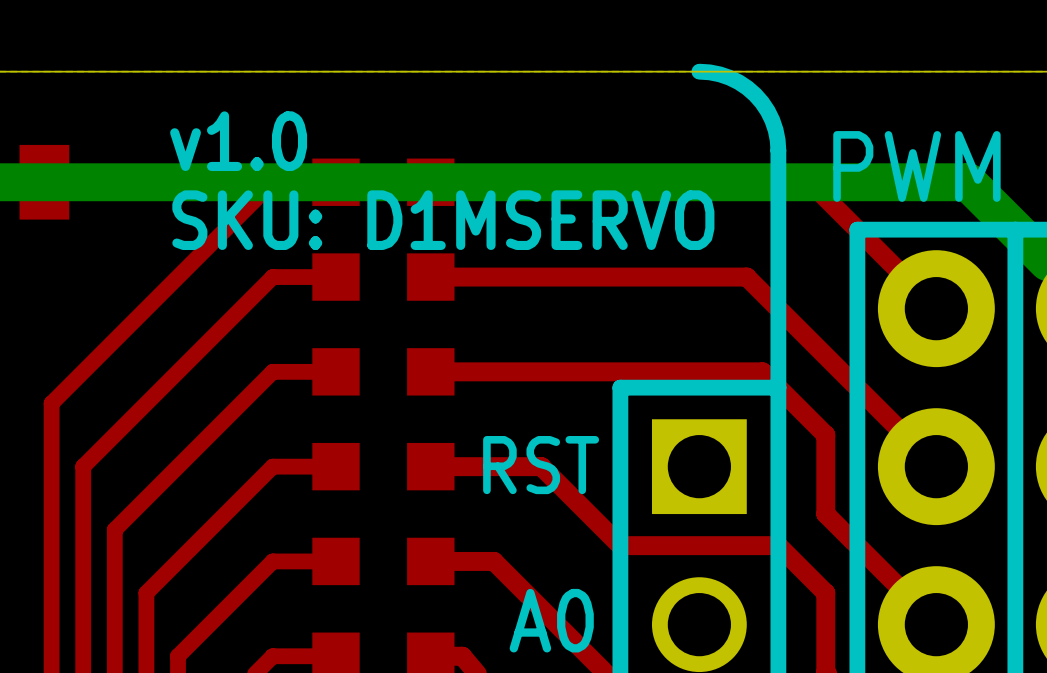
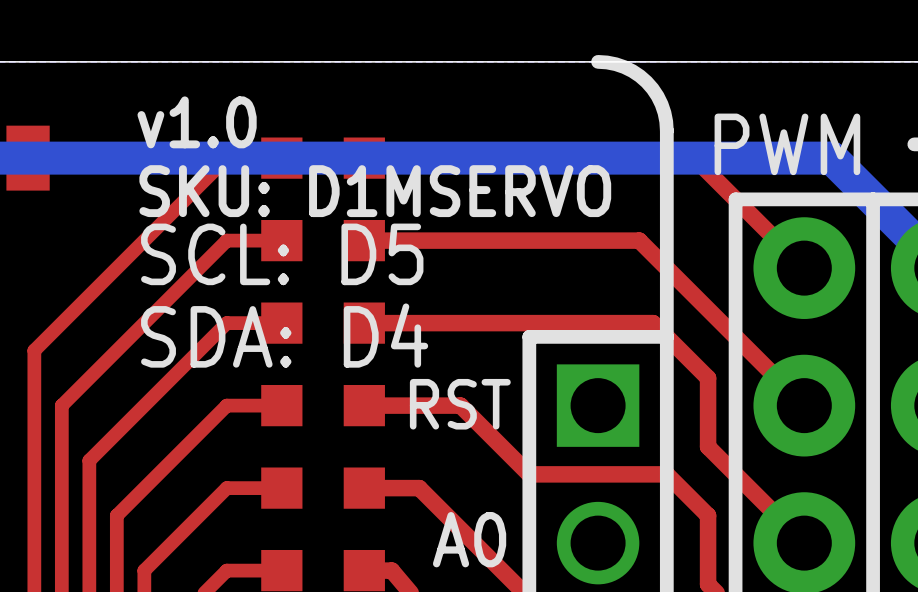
text: none -> SCL: D5 (282, 254)
text: none -> SDA: D4 (284, 335)

